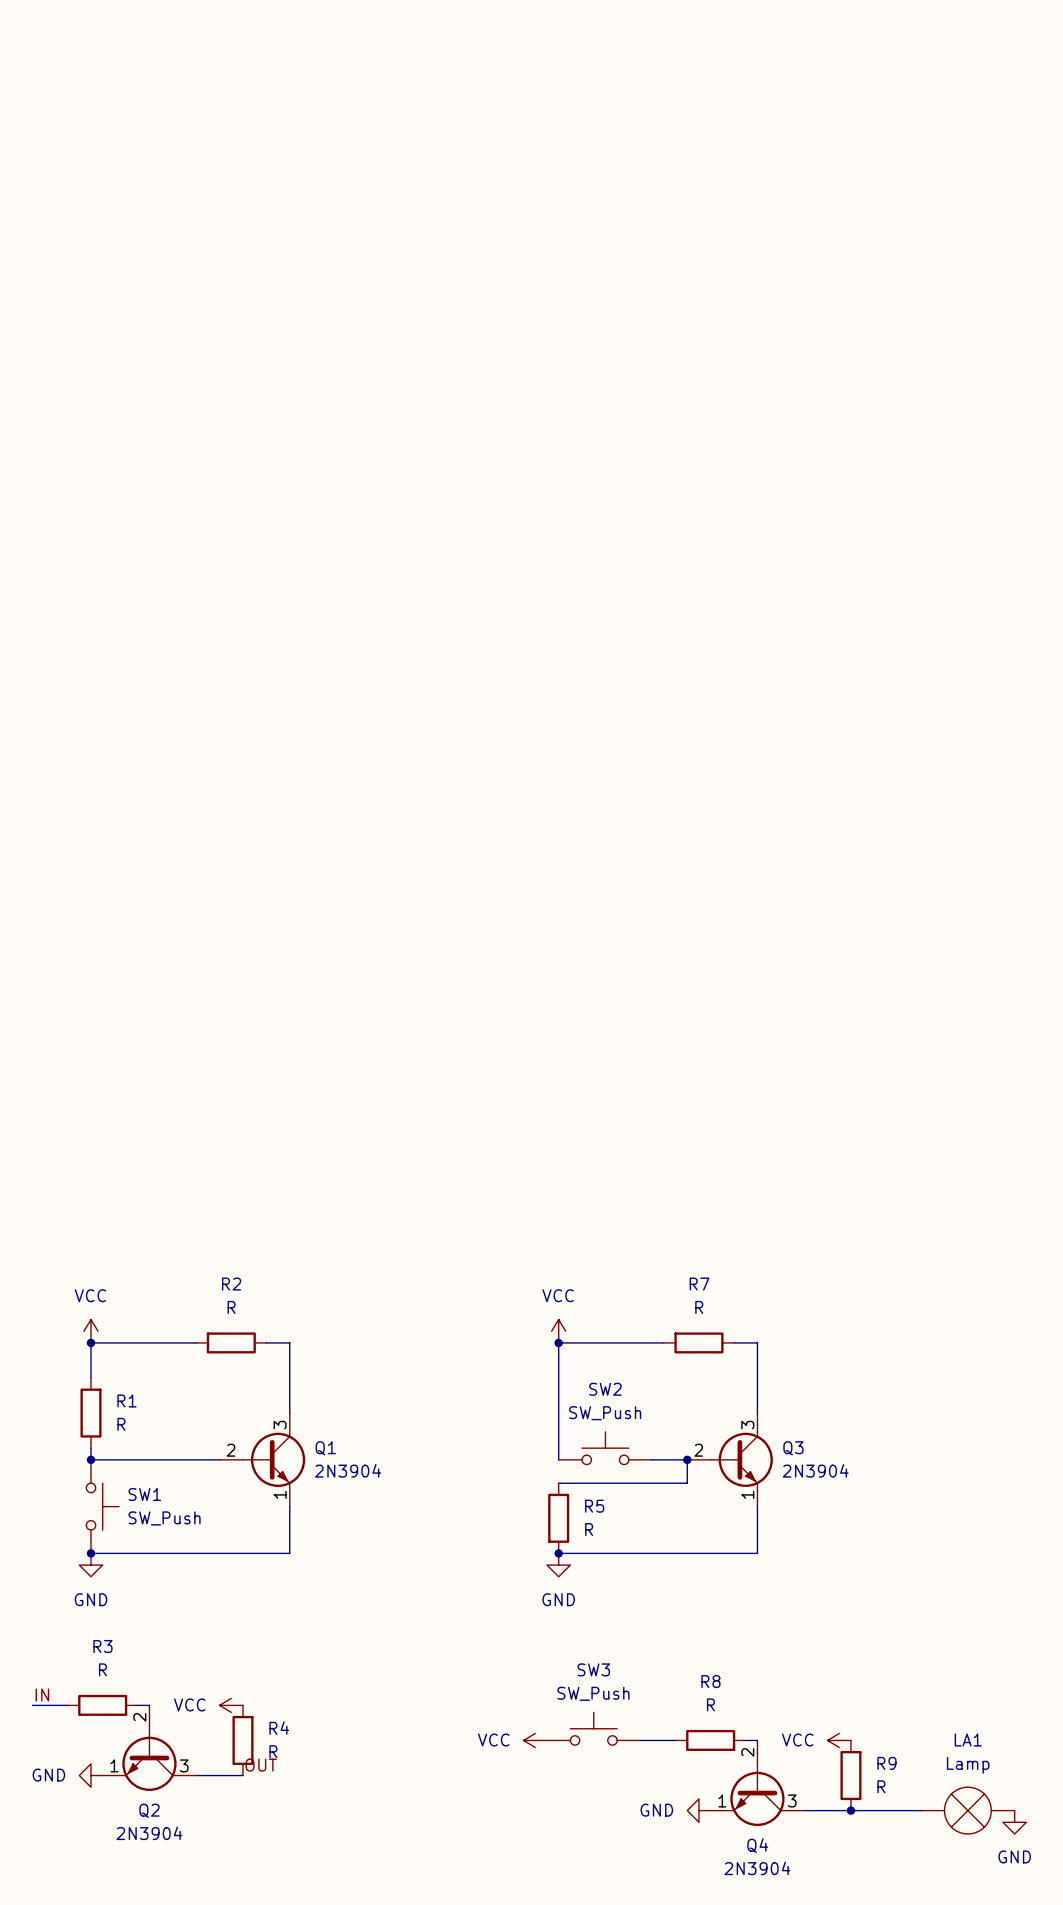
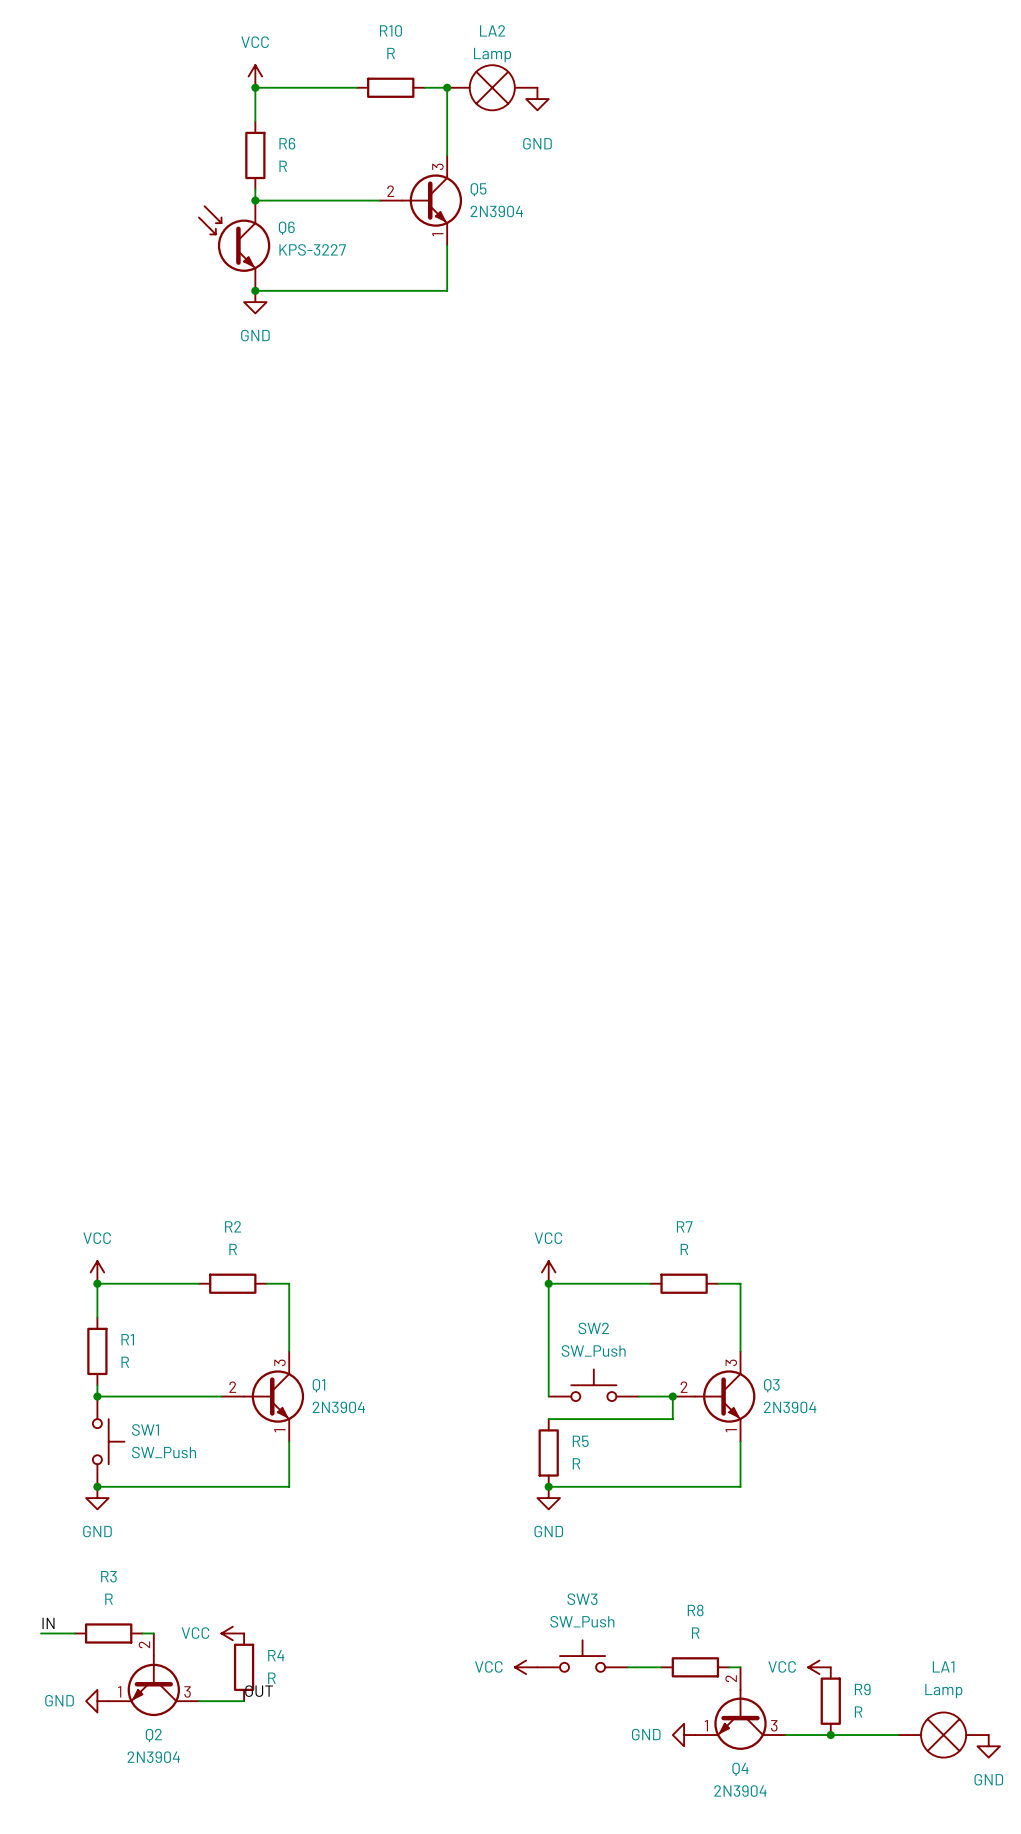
power symbol: none -> VCC (255, 76)
junction: none -> (255, 87)
wire: none -> (356, 87) (255, 87) (255, 121)
R10: none -> R (390, 87)
wire: none -> (424, 87) (447, 87) (447, 155)
junction: none -> (447, 87)
LA2: none -> Lamp (492, 87)
power symbol: none -> GND (537, 99)
R6: none -> R (255, 155)
wire: none -> (255, 189) (255, 200) (379, 200)
junction: none -> (255, 200)
Q5: none -> 2N3904 (420, 200)
Q6: none -> KPS-3227 (234, 245)
wire: none -> (447, 245) (447, 290) (255, 290)
junction: none -> (255, 290)
power symbol: none -> GND (255, 302)

